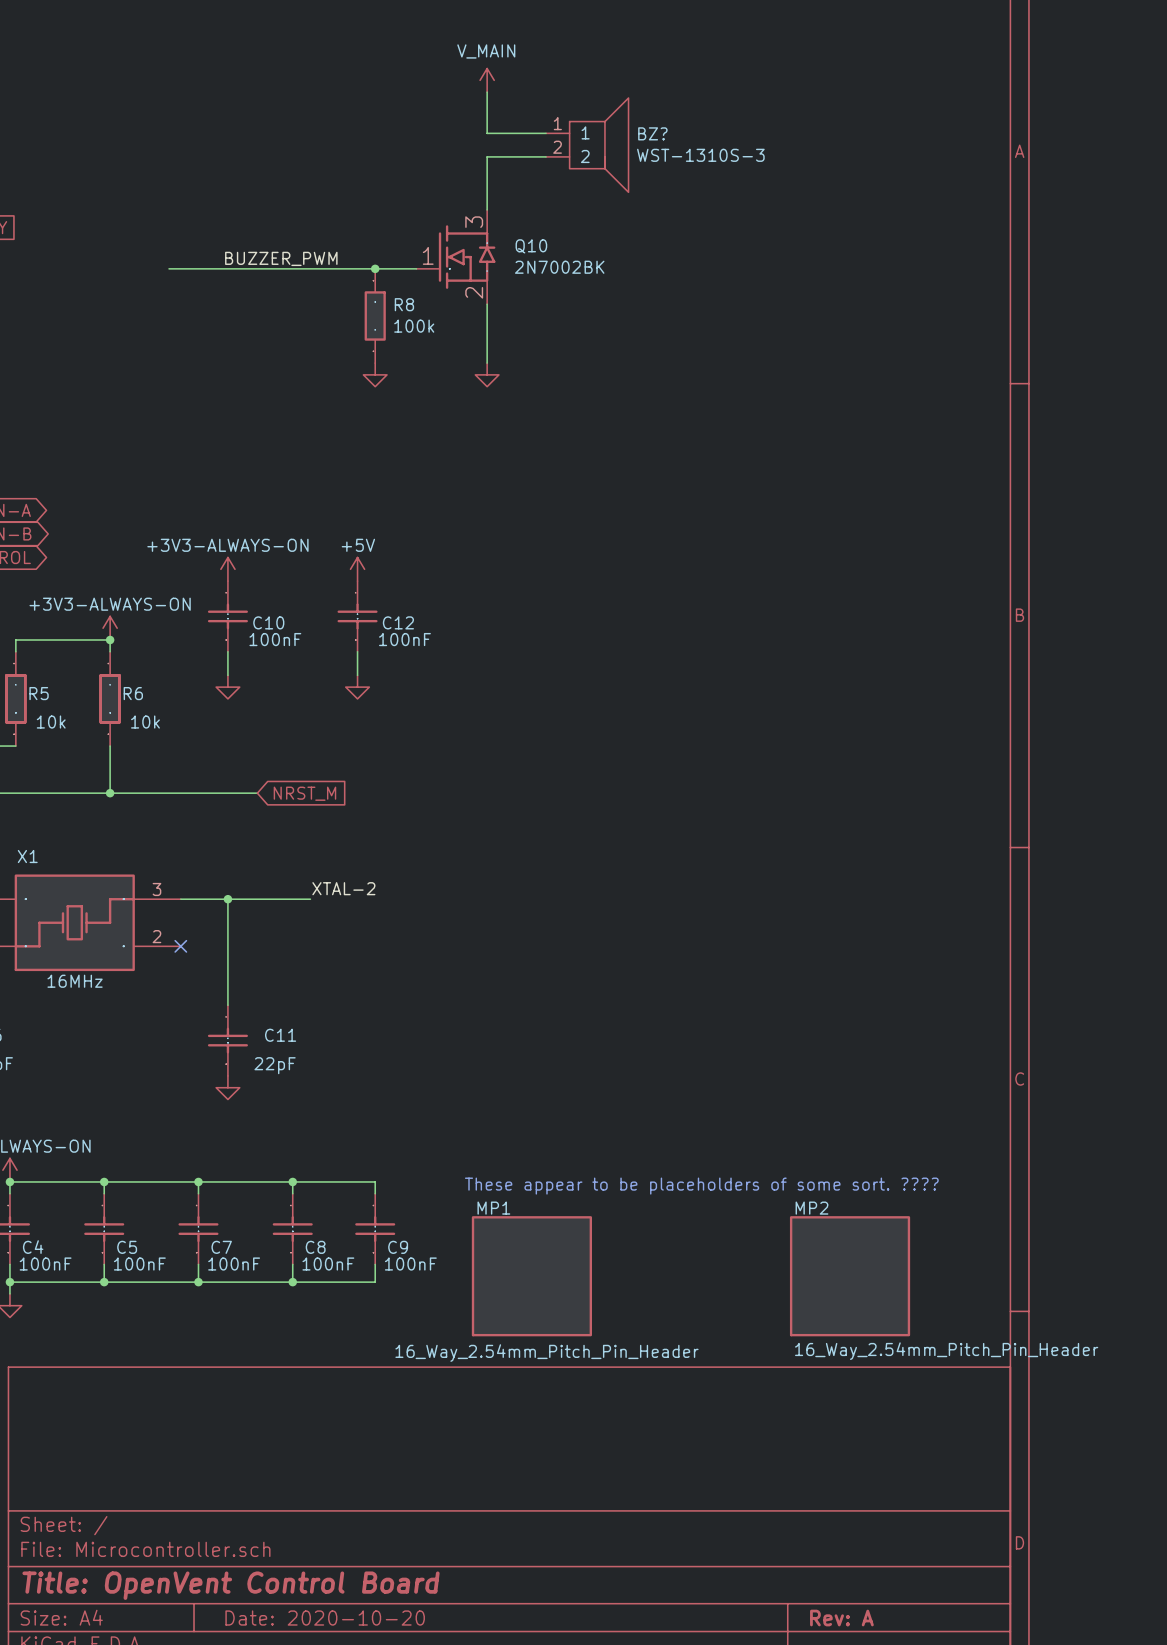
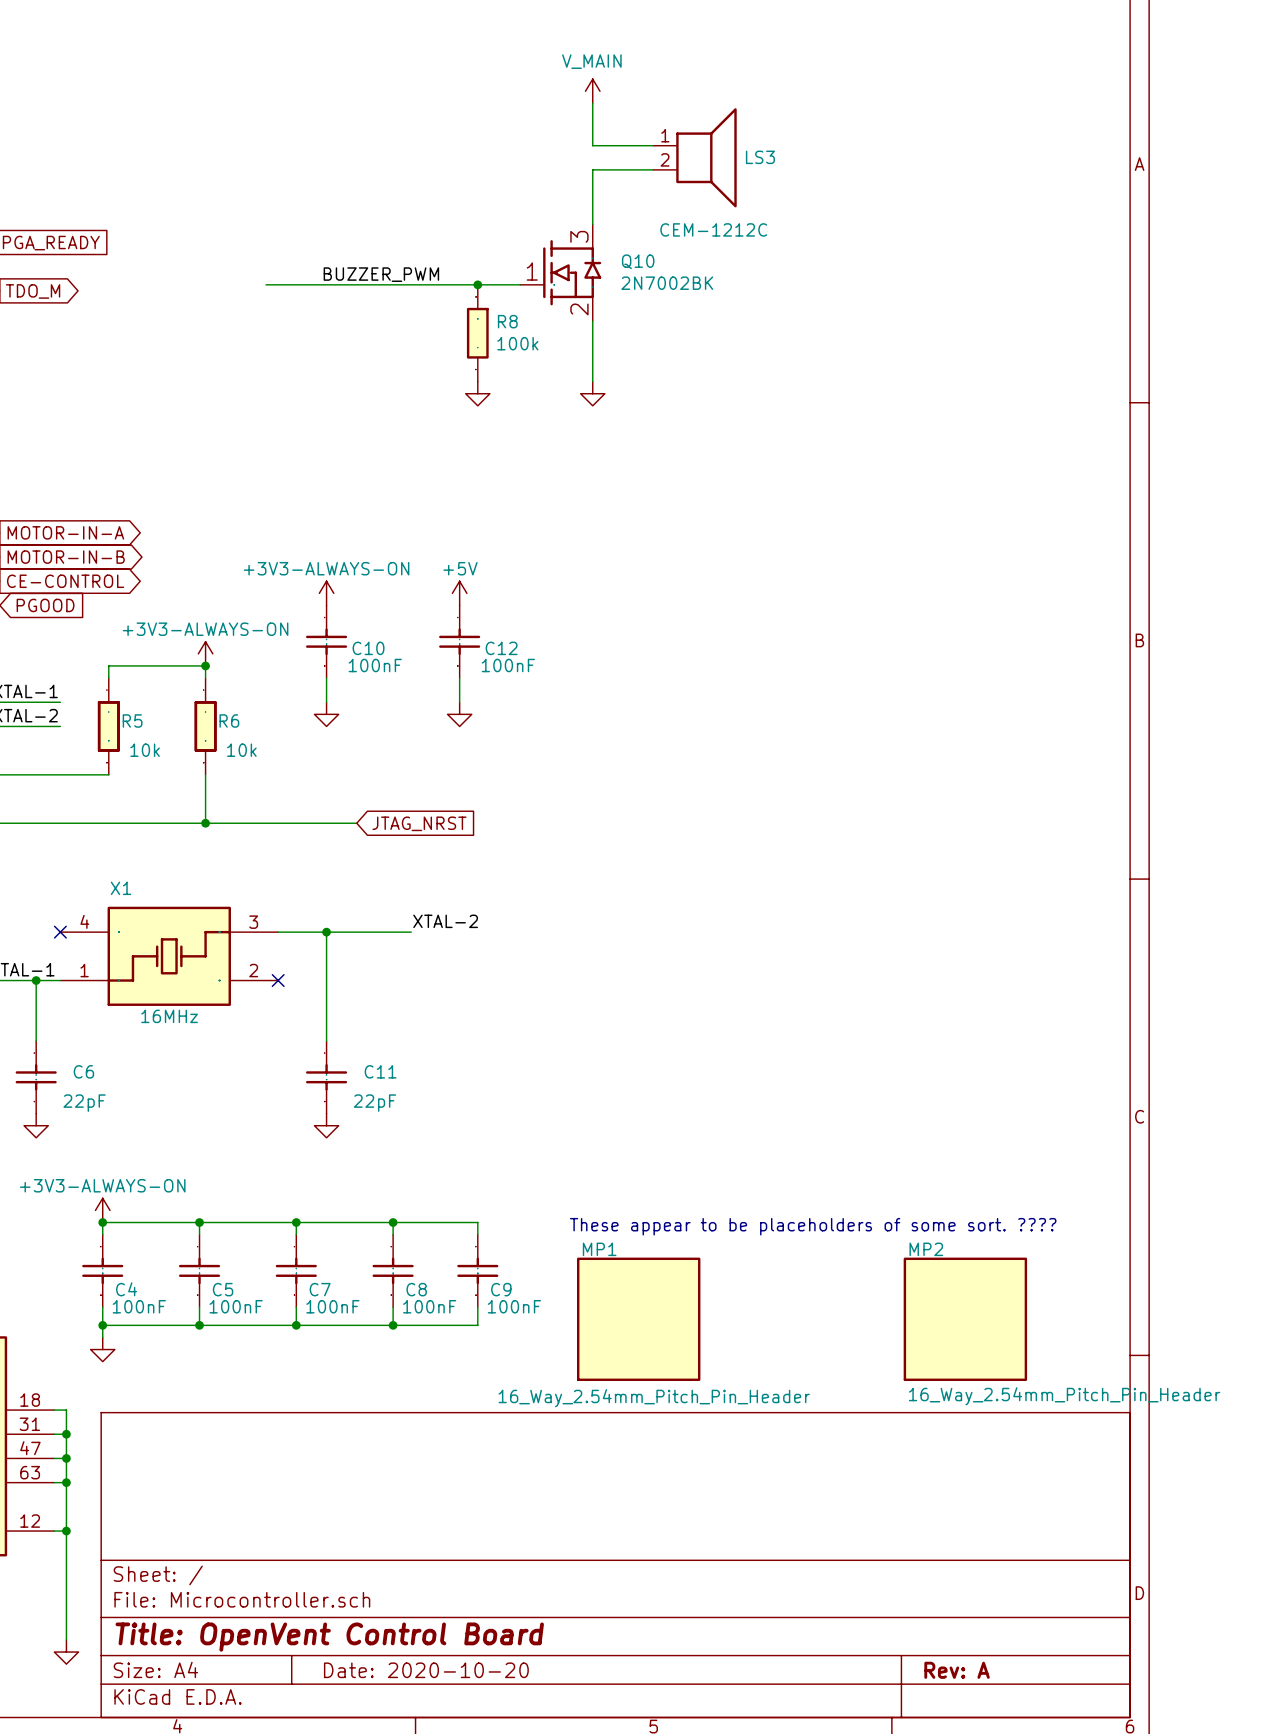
LS3: none -> (694, 157)
BZ?: WST-1310S-3 (587, 145) -> none
global label: NRST_M (304, 793) -> JTAG_NRST (419, 823)

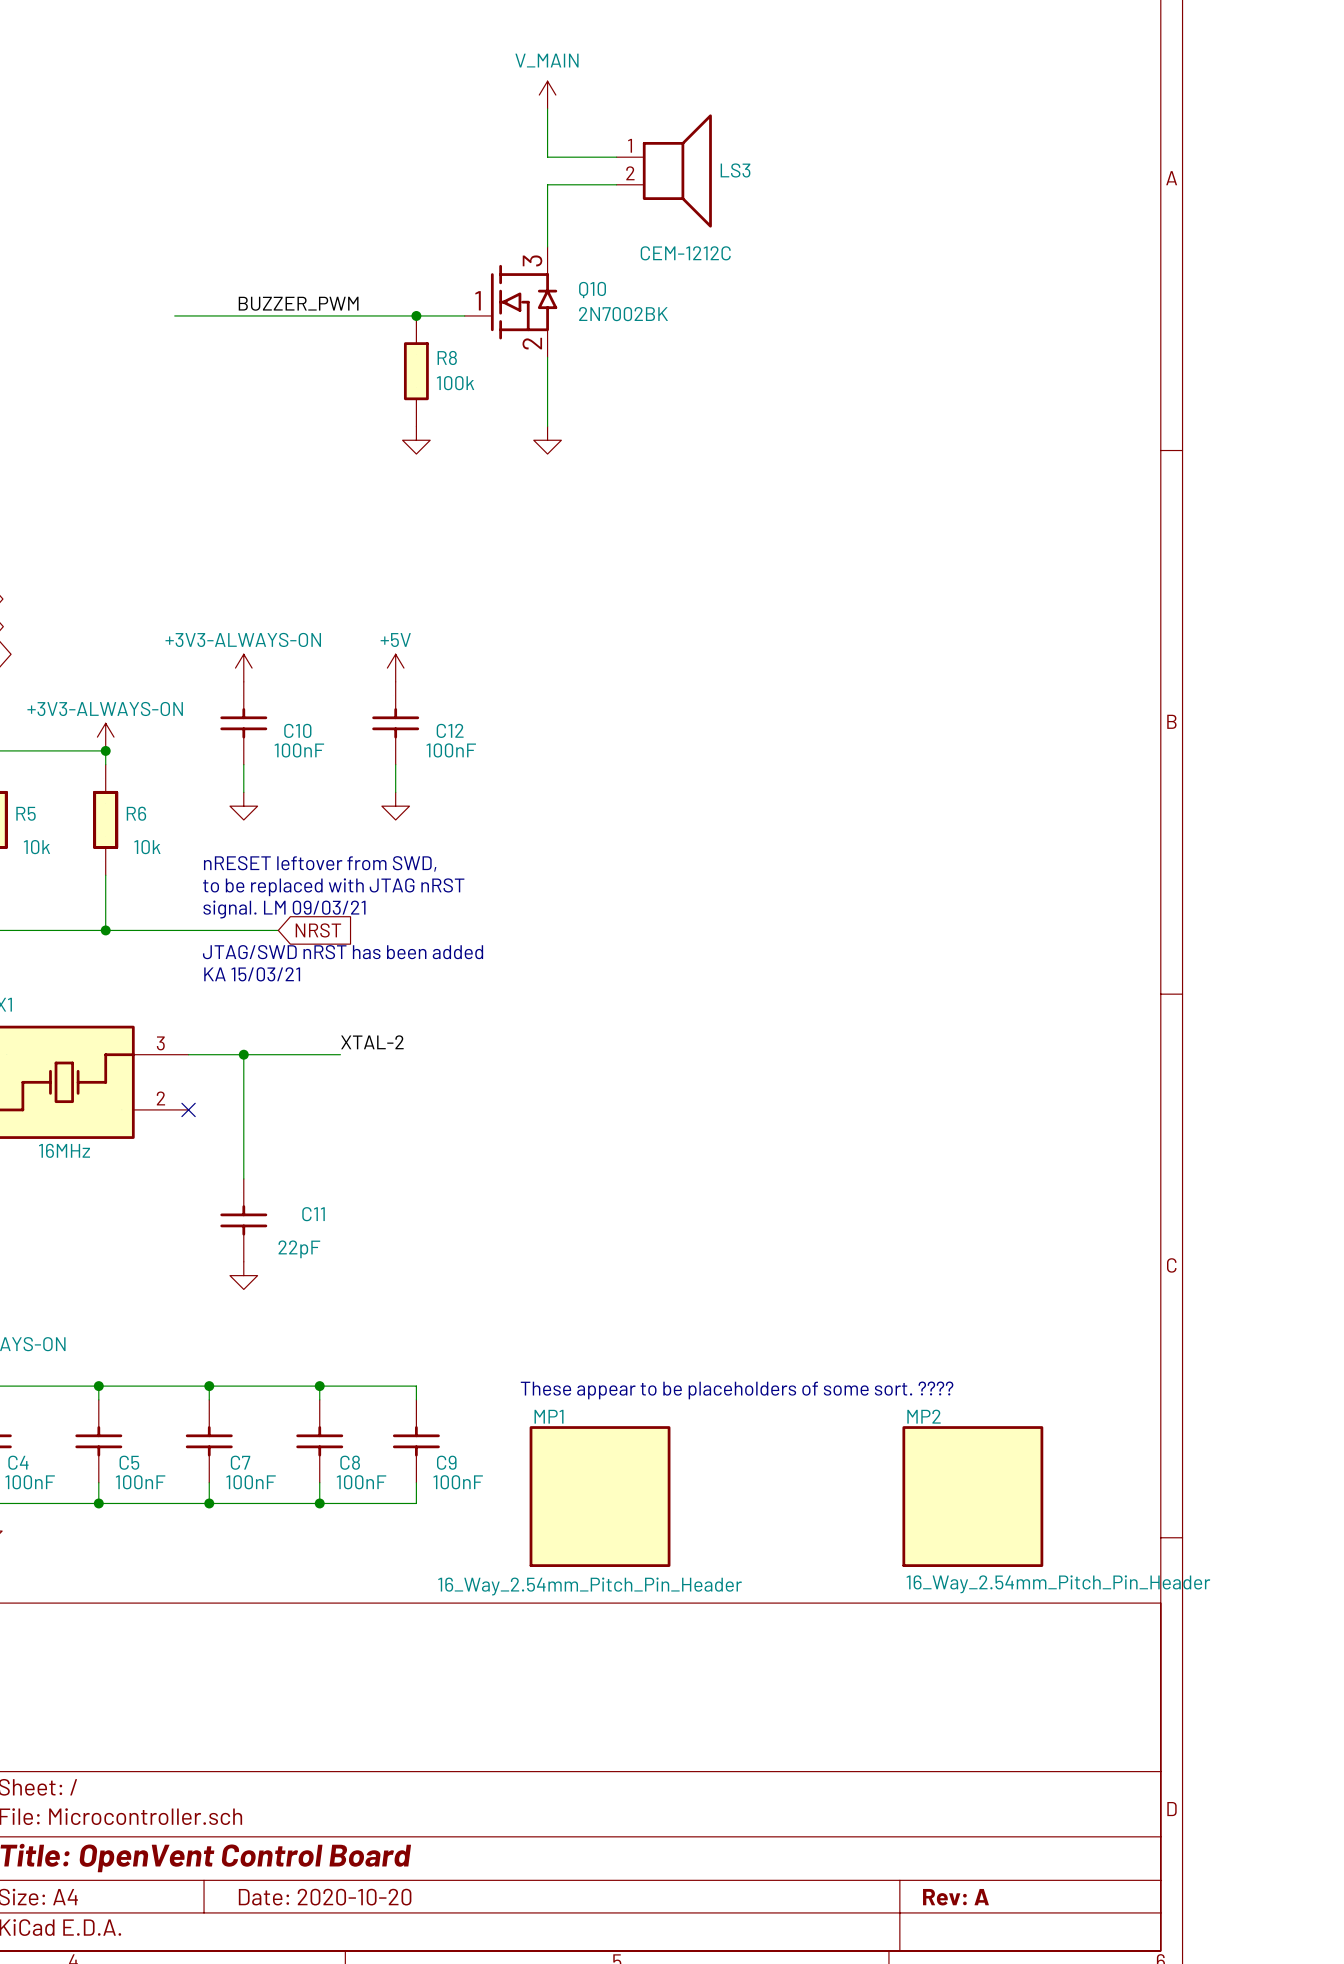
text: none -> nRESET leftover from SWD, (320, 863)
text: none -> to be replaced with JTAG nRST (333, 887)
text: none -> signal. LM 09/03/21 (284, 909)
global label: JTAG_NRST (419, 823) -> NRST (318, 930)
text: none -> JTAG/SWD nRST has been added (343, 952)
text: none -> KA 15/03/21 (252, 974)

